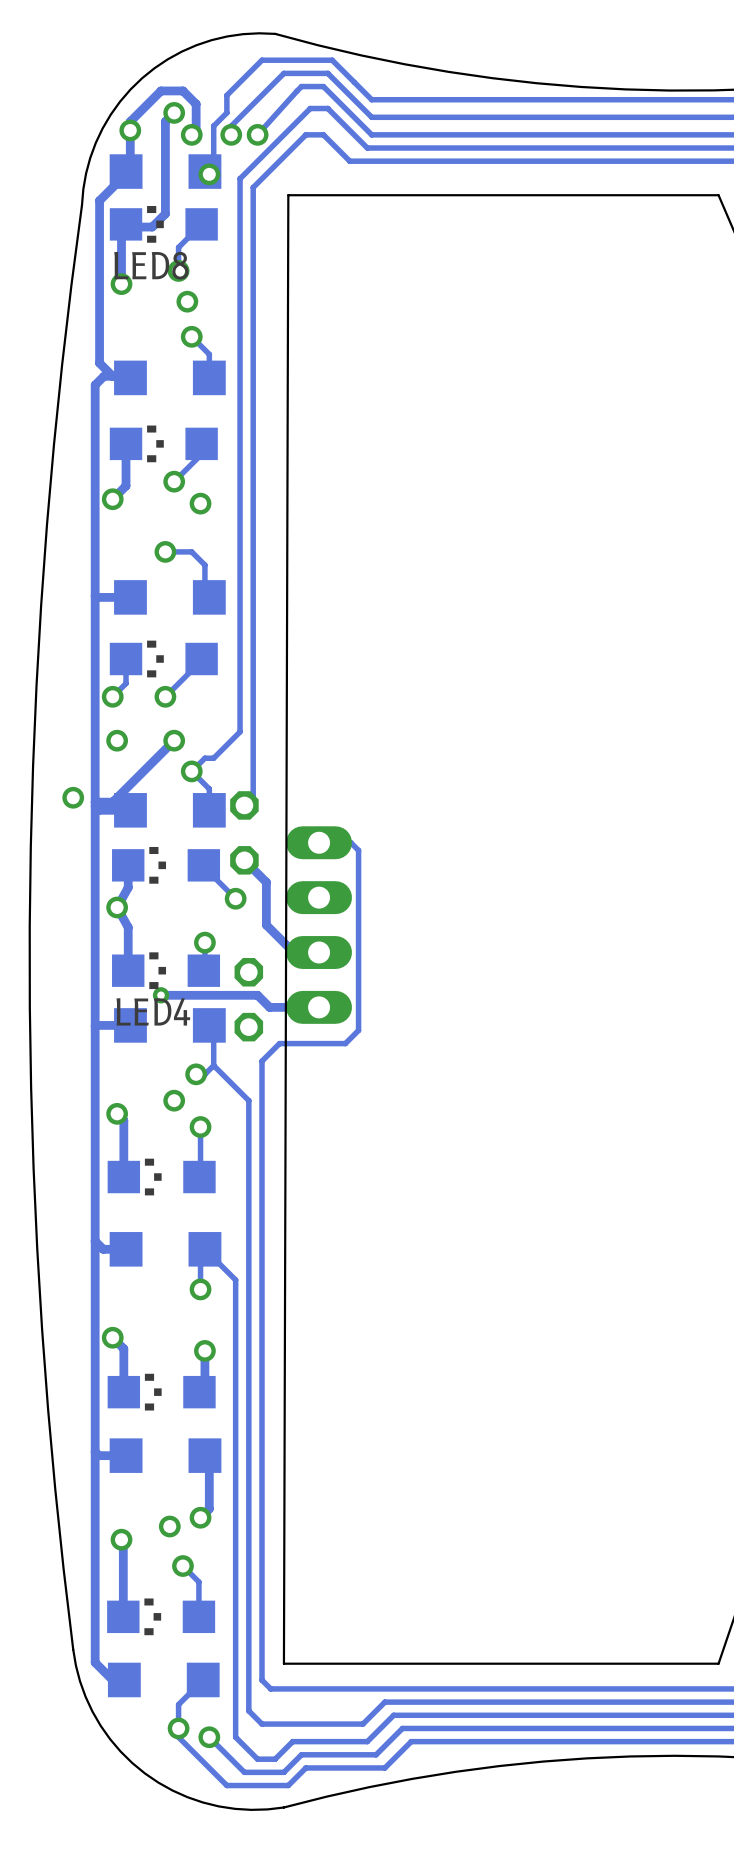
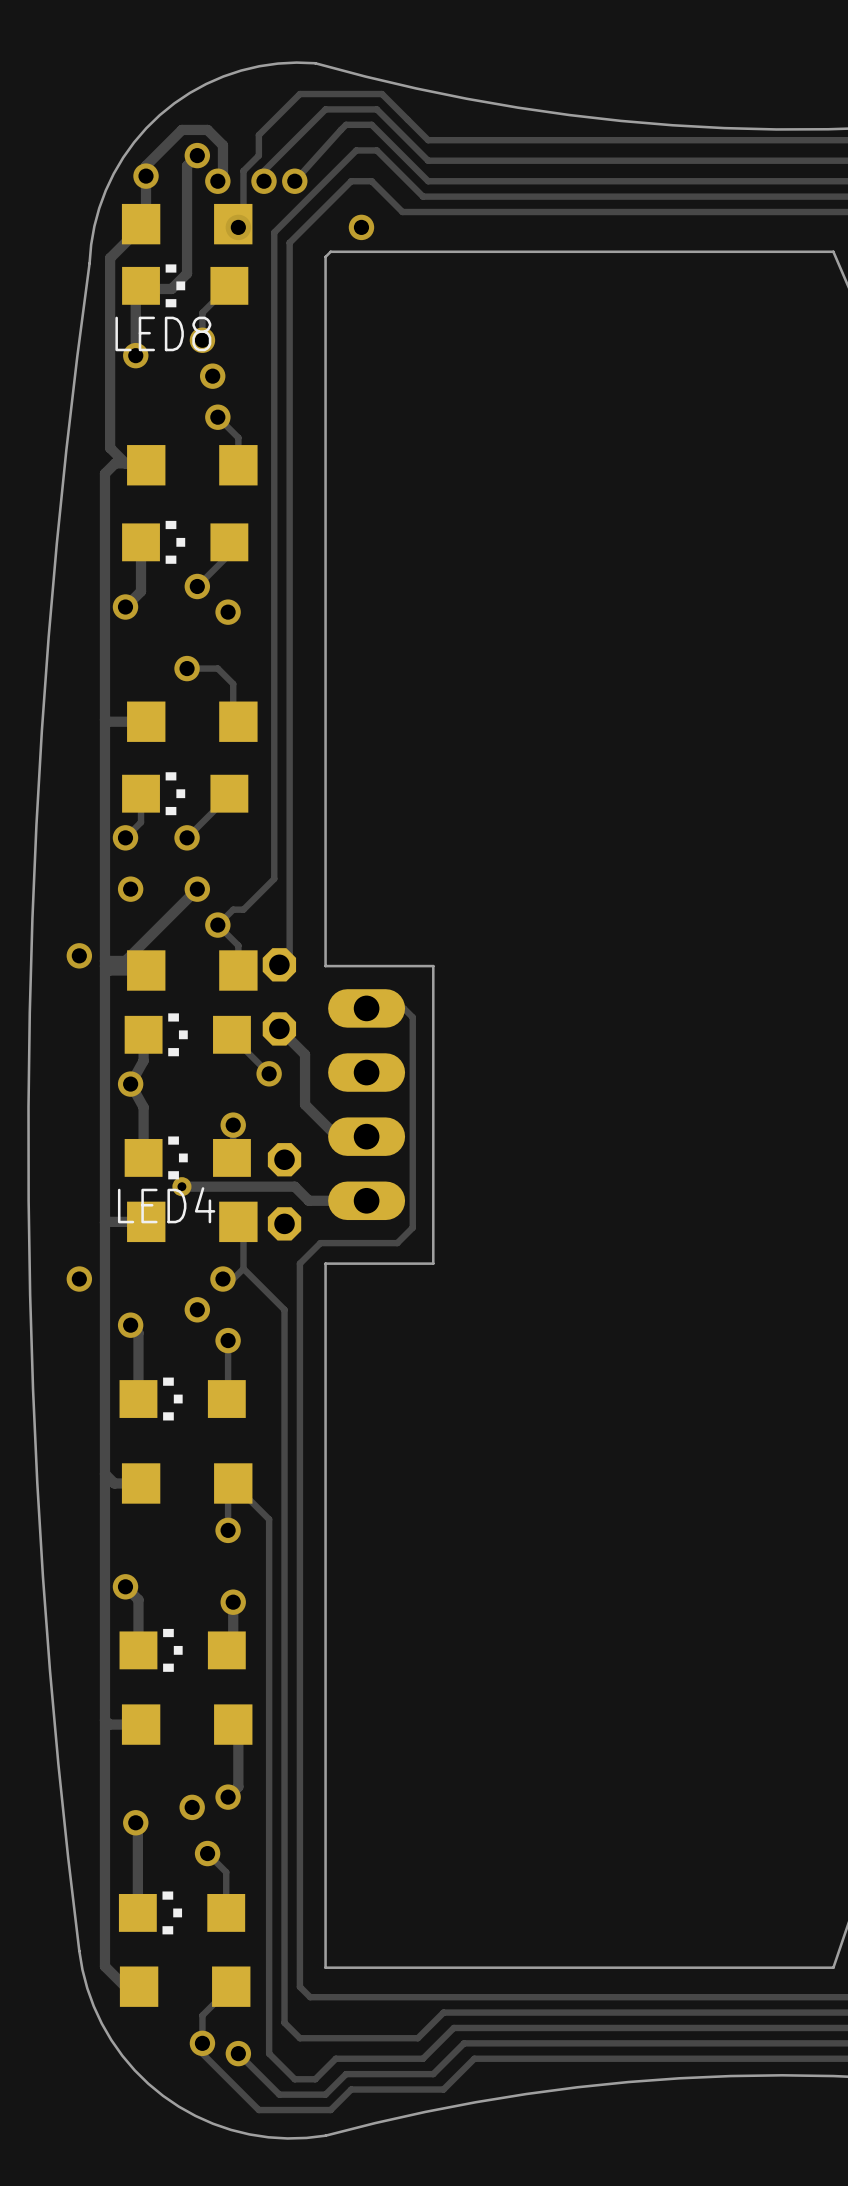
via: none -> (361, 227)
board edge: (288, 195) (283, 1663) -> (330, 251) (325, 256) (325, 966) (433, 966) (433, 1263) (325, 1263) (325, 1967)
via: none -> (79, 1279)

